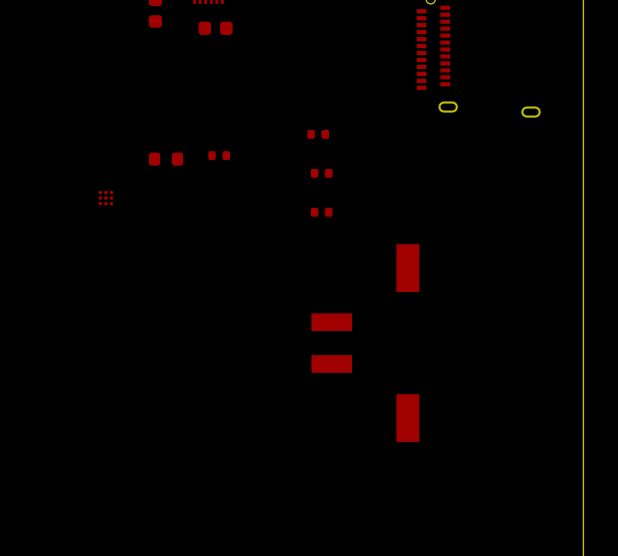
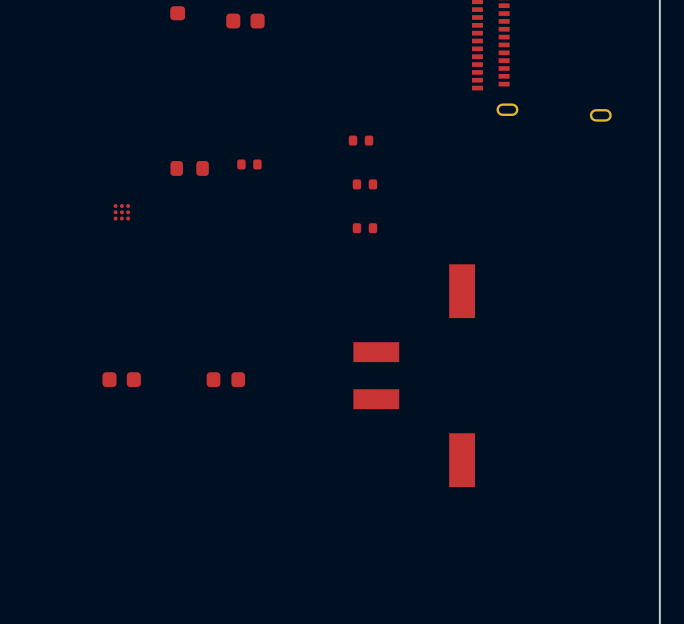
part: none -> (121, 379)
part: none -> (225, 379)

